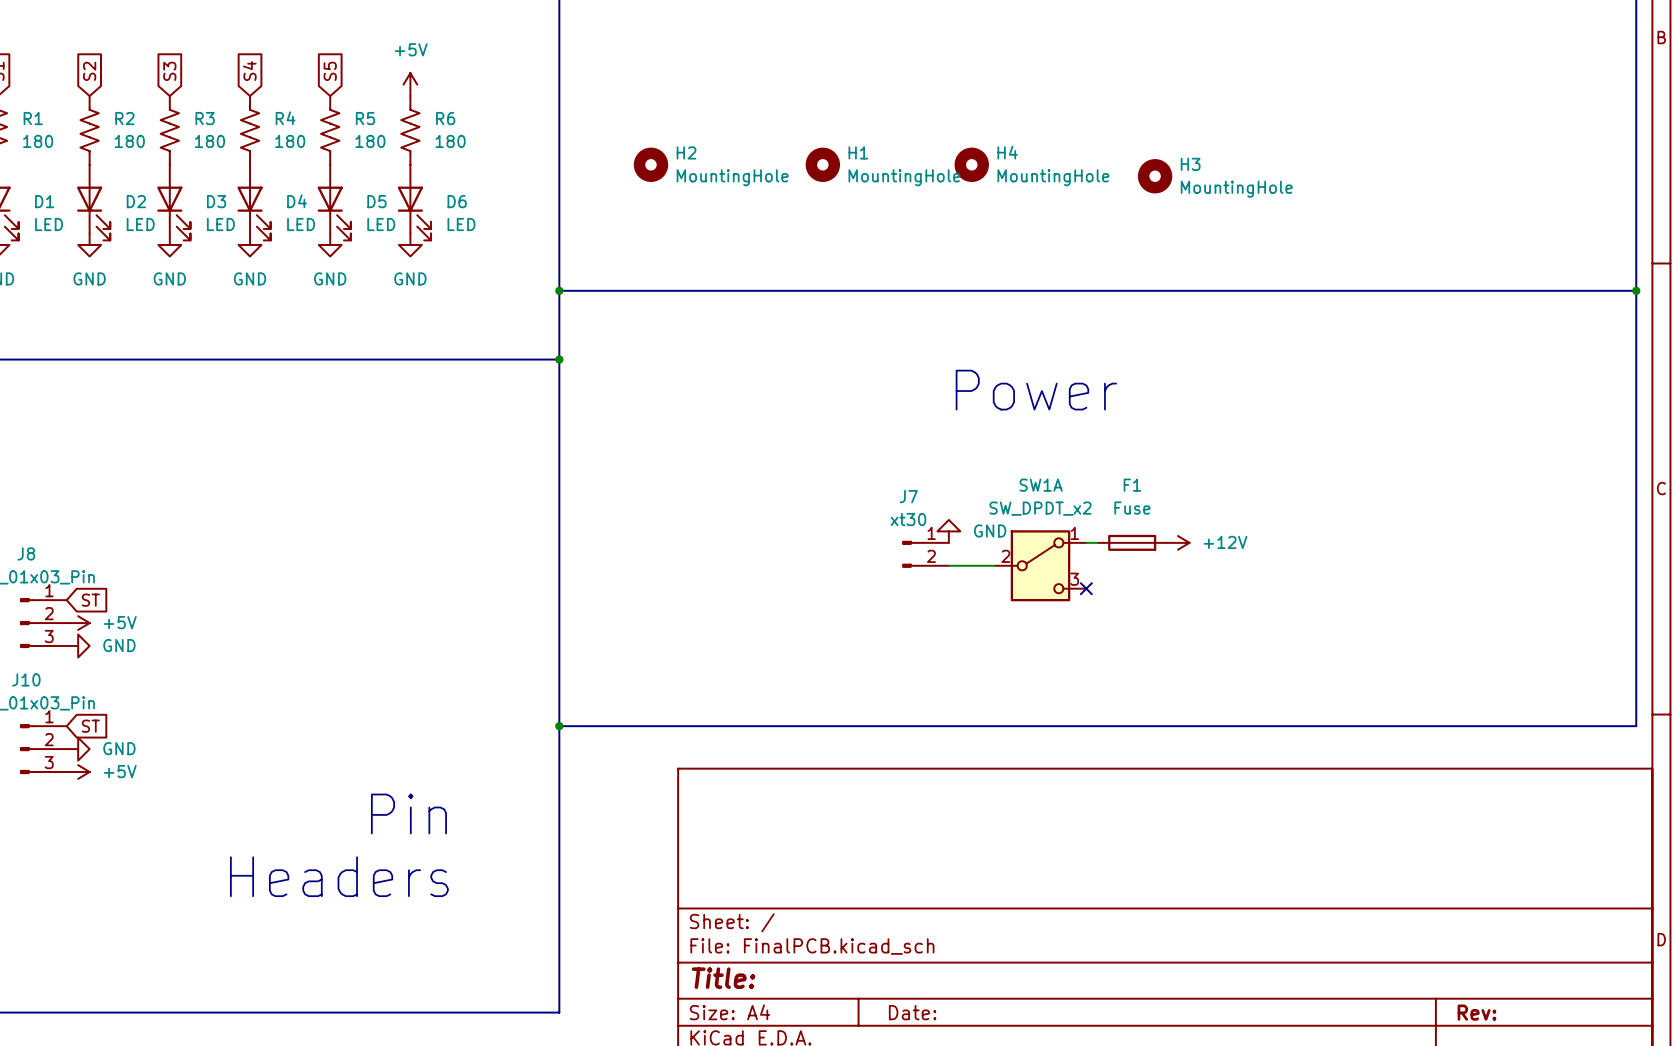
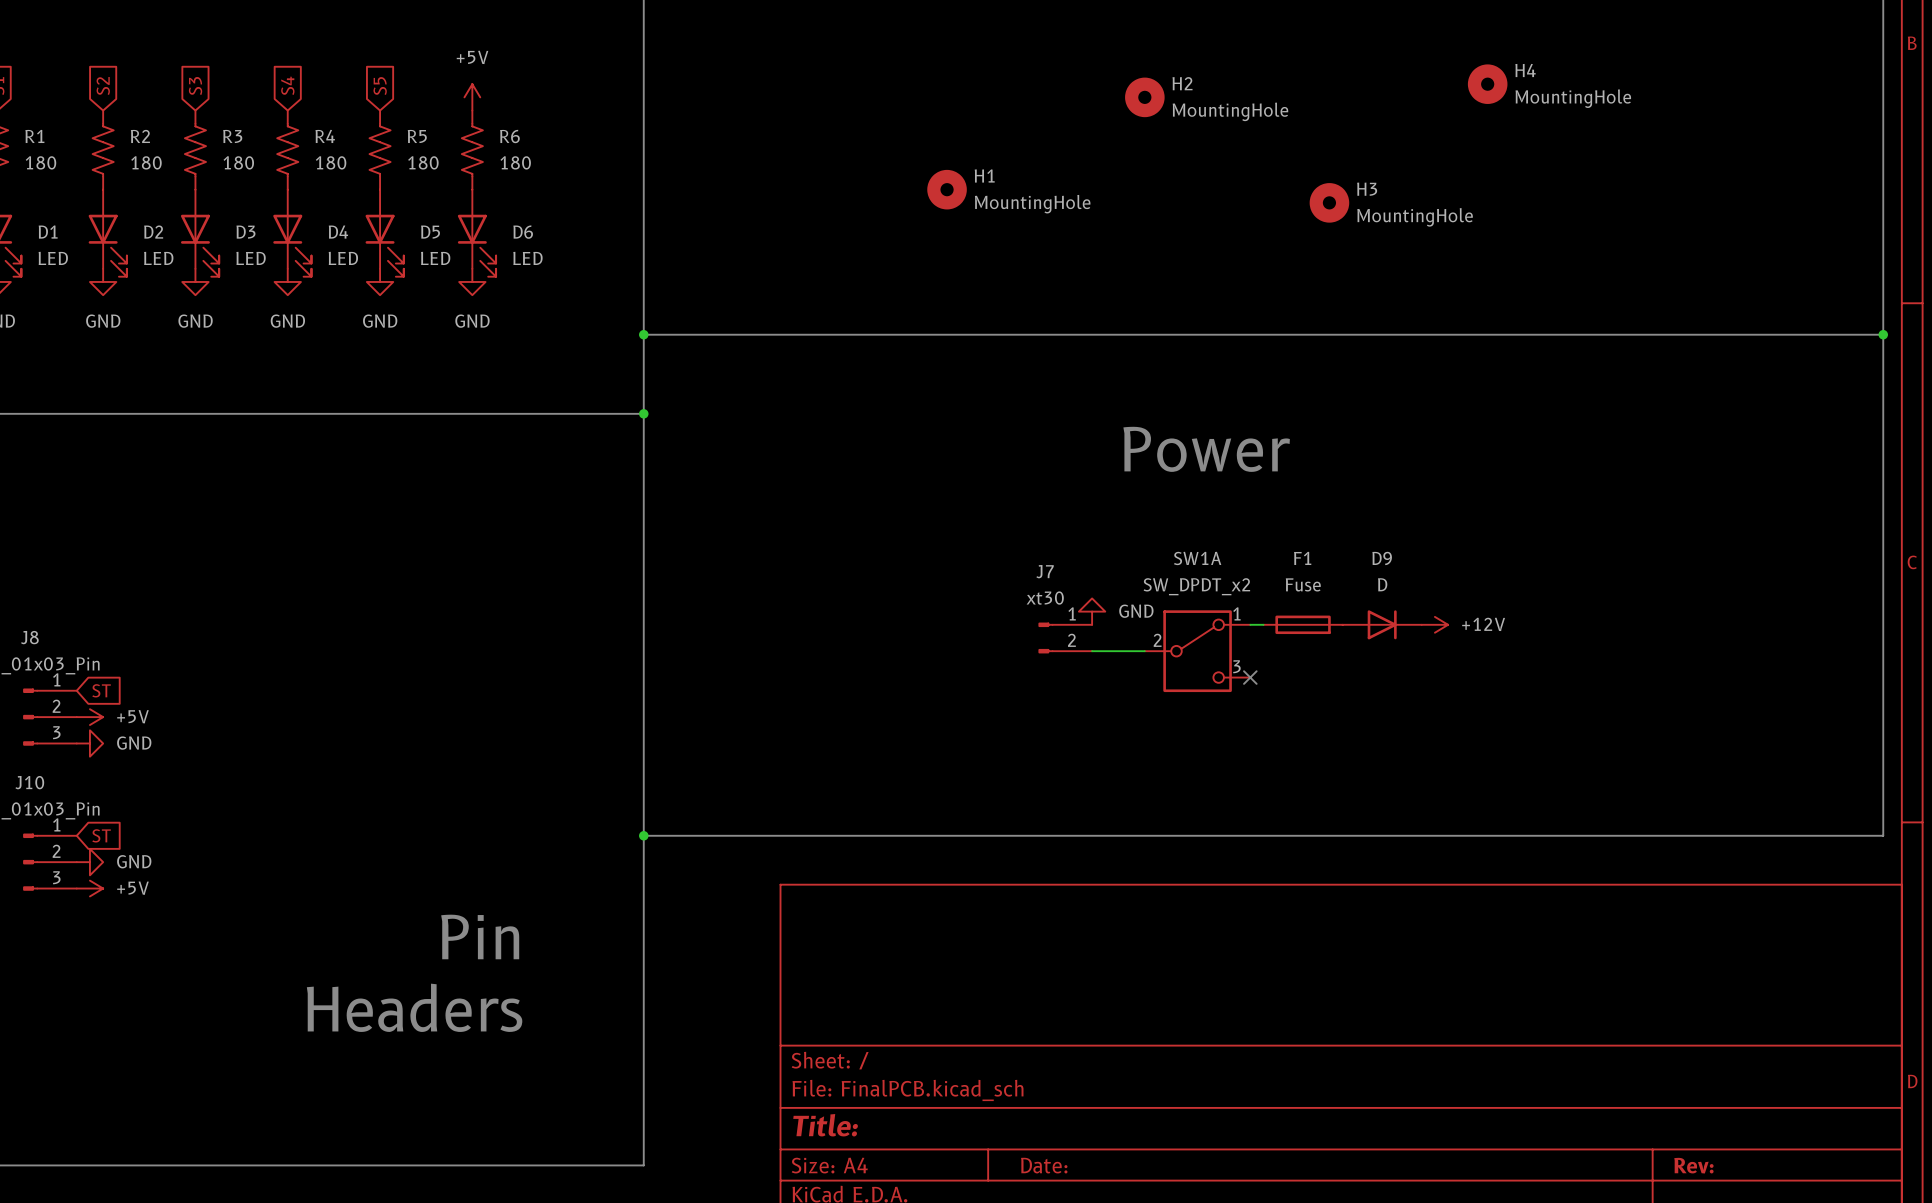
H2 position: (650, 164) -> (1144, 97)
H4 position: (971, 164) -> (1487, 84)
power symbol position: +12V (1177, 542) -> +12V (1434, 624)
D9: none -> D (1382, 624)

